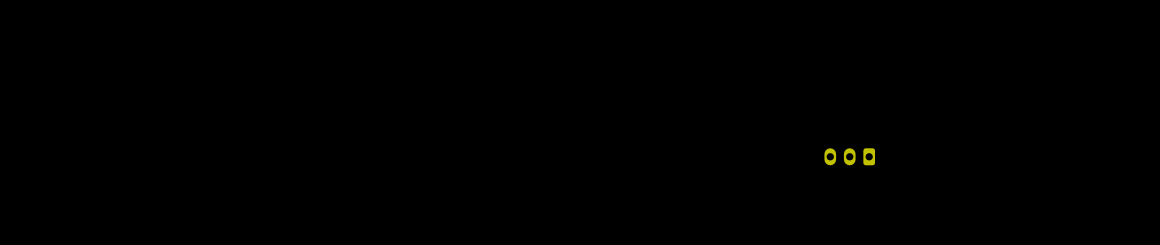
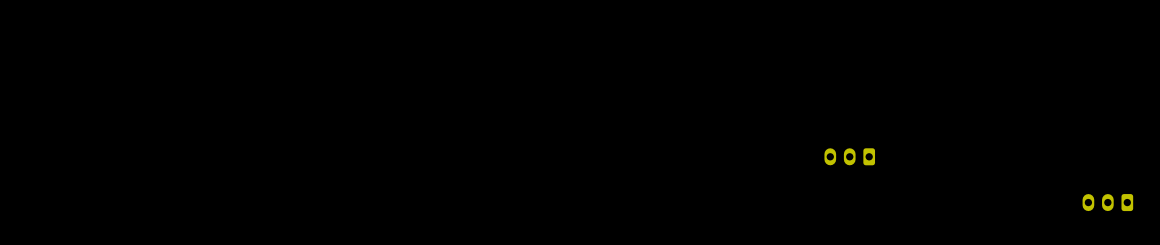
part: none -> (1107, 202)

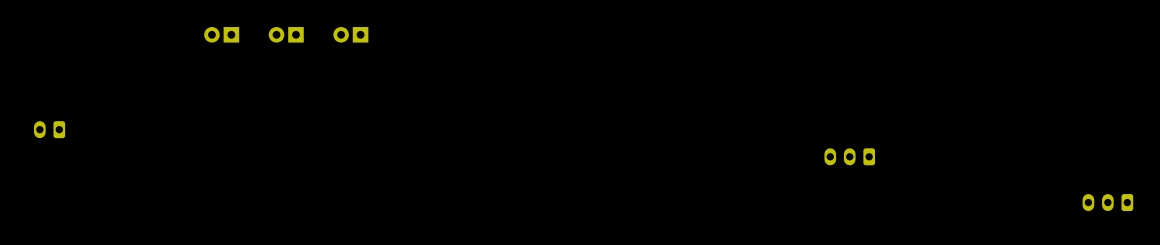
part: none -> (221, 34)
part: none -> (286, 34)
part: none -> (350, 34)
part: none -> (49, 129)

